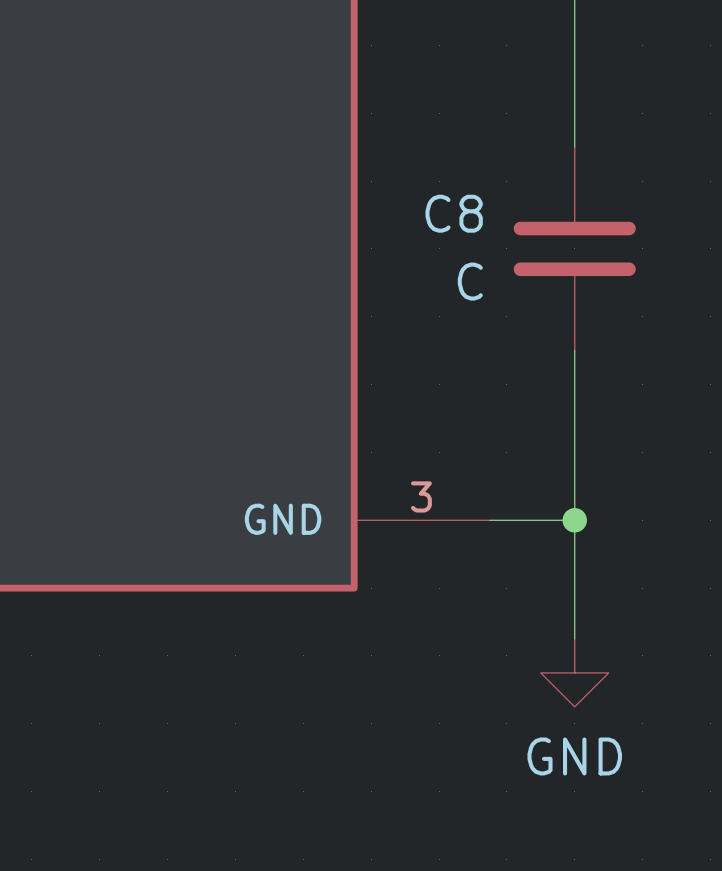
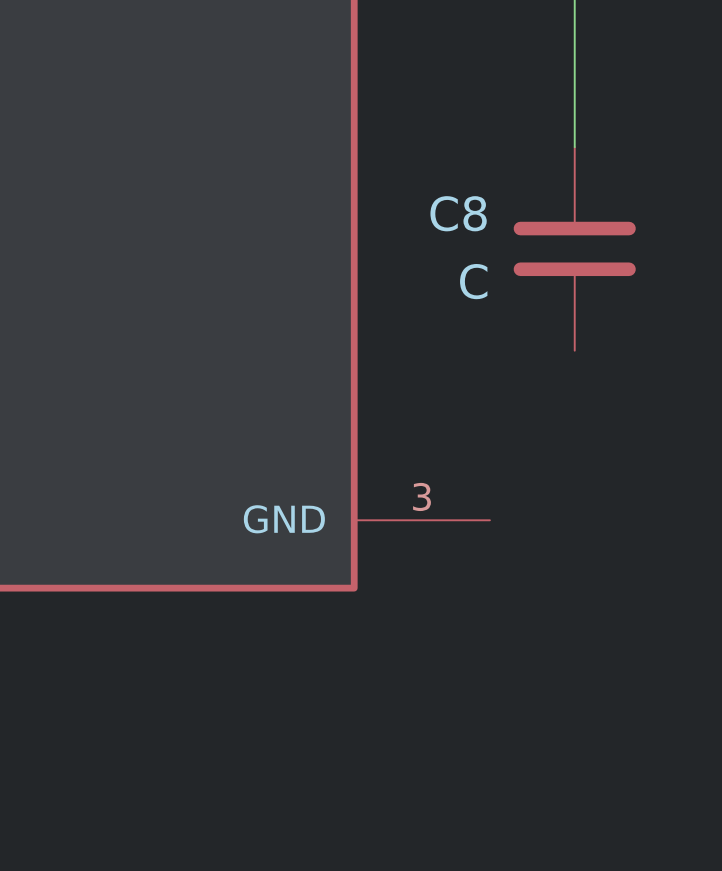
wire: (574, 350) (574, 639) -> none
wire: (489, 520) (574, 520) -> none
junction: (574, 520) -> none
power symbol: GND (574, 672) -> none

